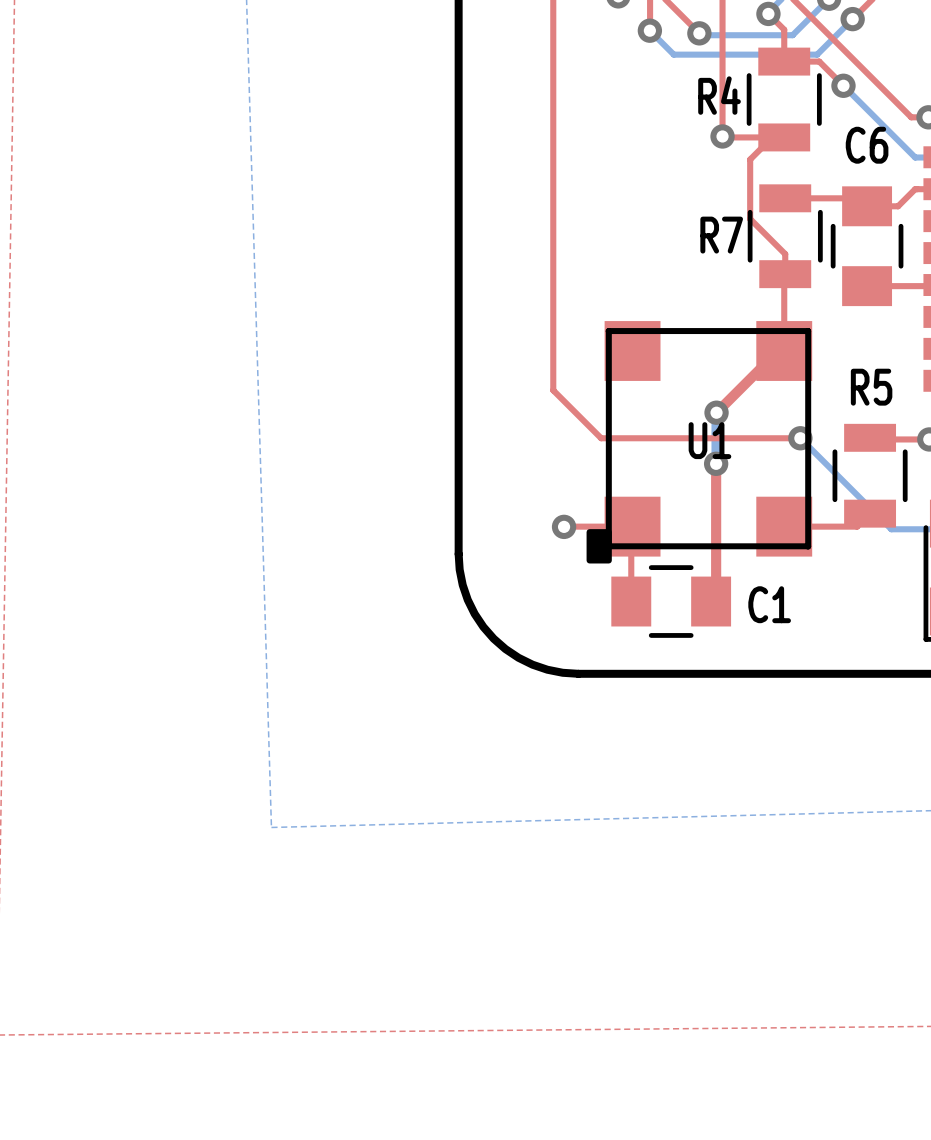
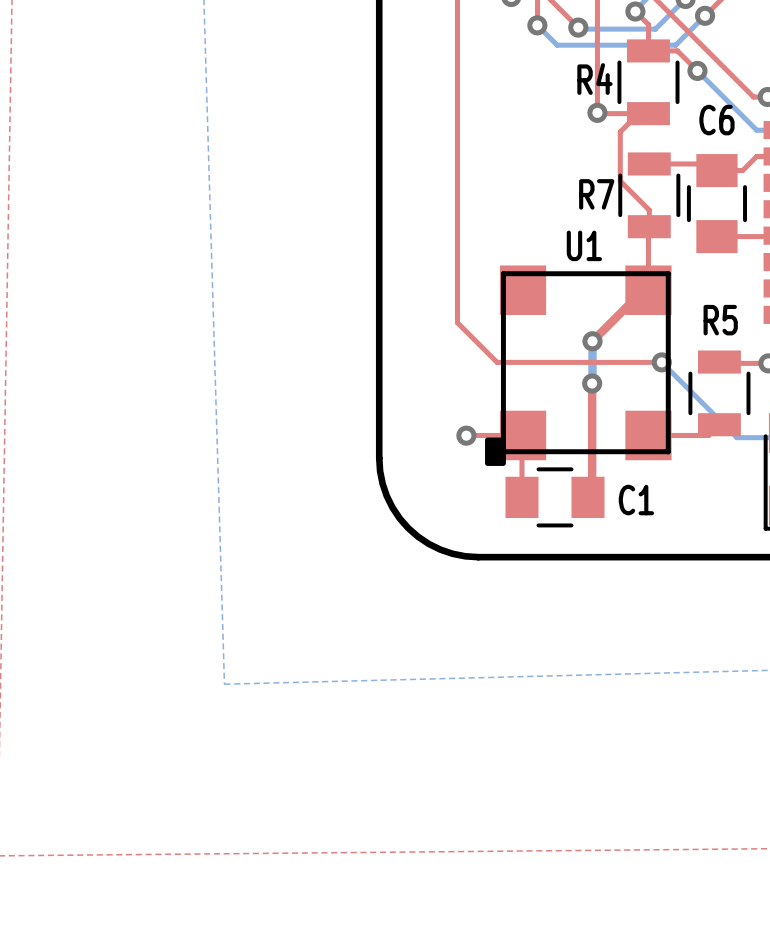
U1 name position: U1 (709, 440) -> U1 (584, 245)

